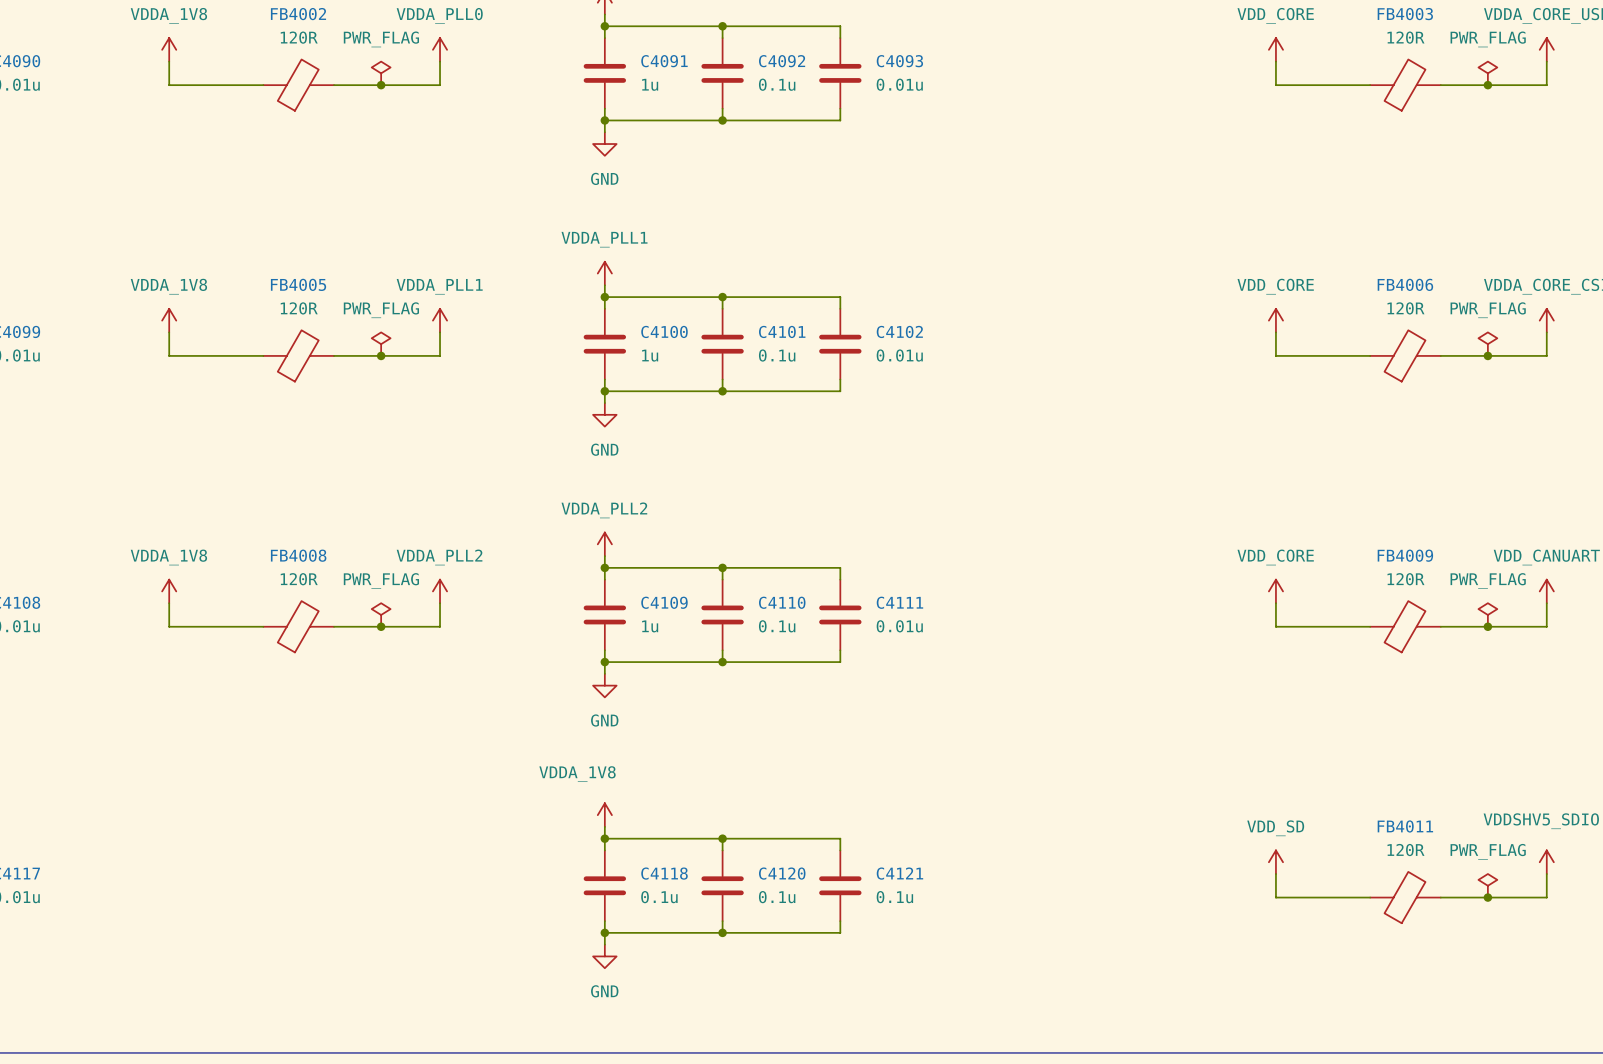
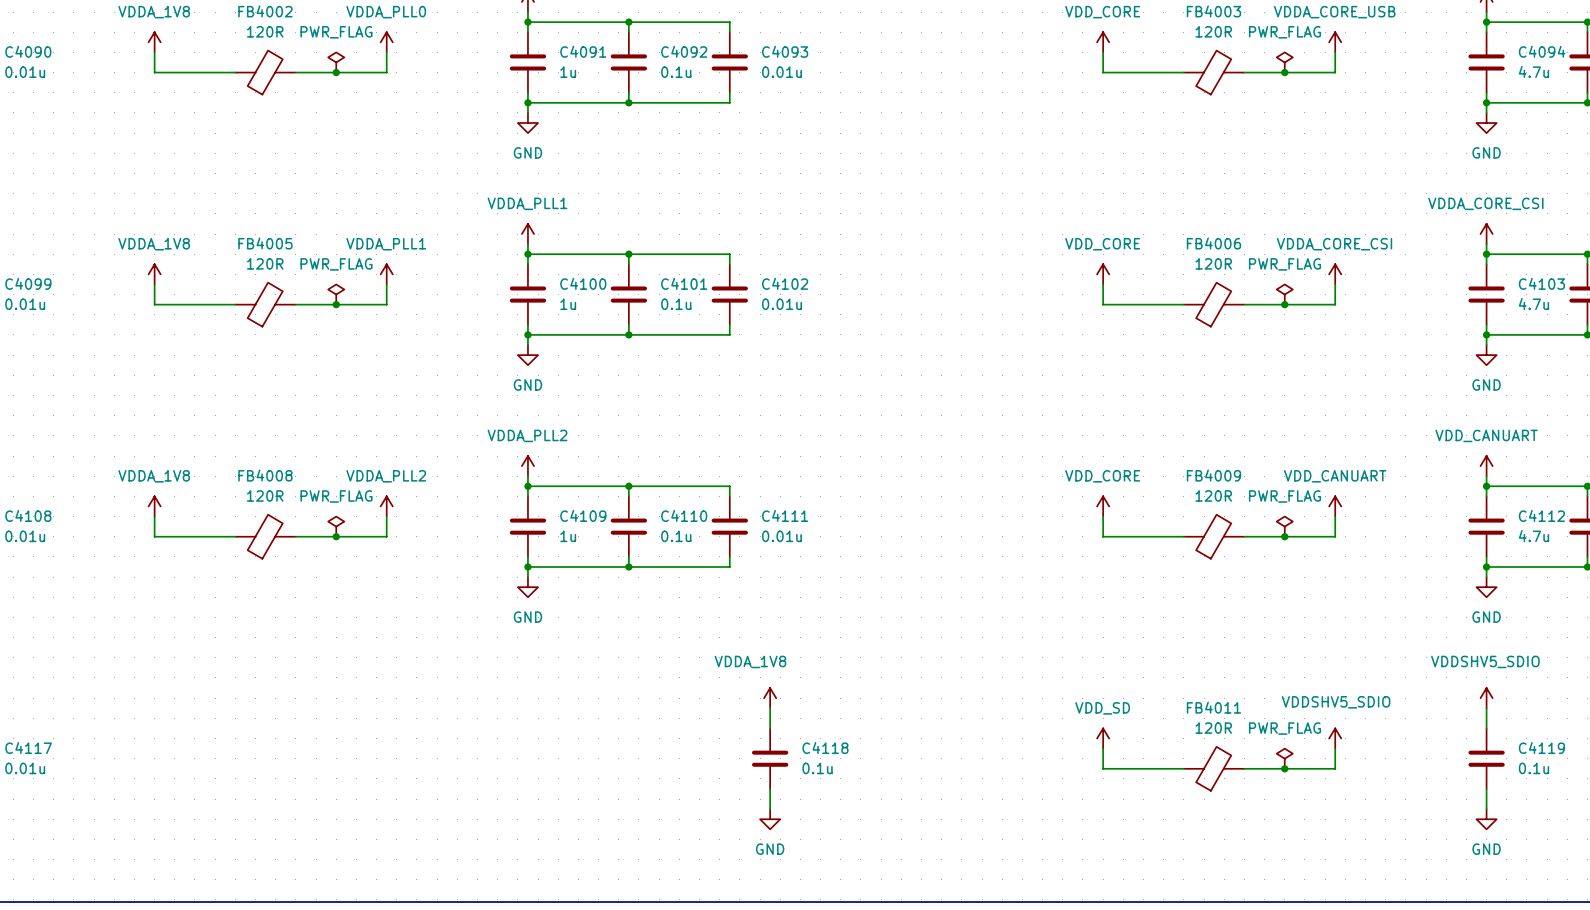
power symbol: VDDA_1V8 (604, 815) -> none
power symbol: none -> VDDA_1V8 (770, 698)
wire: (604, 826) (604, 850) -> none
wire: none -> (770, 708) (770, 728)
wire: (604, 838) (840, 838) (840, 850) -> none
junction: (604, 838) -> none
wire: (722, 838) (722, 850) -> none
junction: (722, 838) -> none
C4118 position: (604, 885) -> (770, 758)
C4120: 0.1u (722, 885) -> none
C4121: 0.1u (840, 885) -> none
wire: (604, 921) (604, 944) -> none
wire: (722, 921) (722, 932) -> none
wire: (840, 921) (840, 932) (604, 932) -> none
wire: none -> (770, 788) (770, 809)
junction: (604, 932) -> none
junction: (722, 932) -> none
power symbol: GND (604, 956) -> none
power symbol: none -> GND (770, 819)

